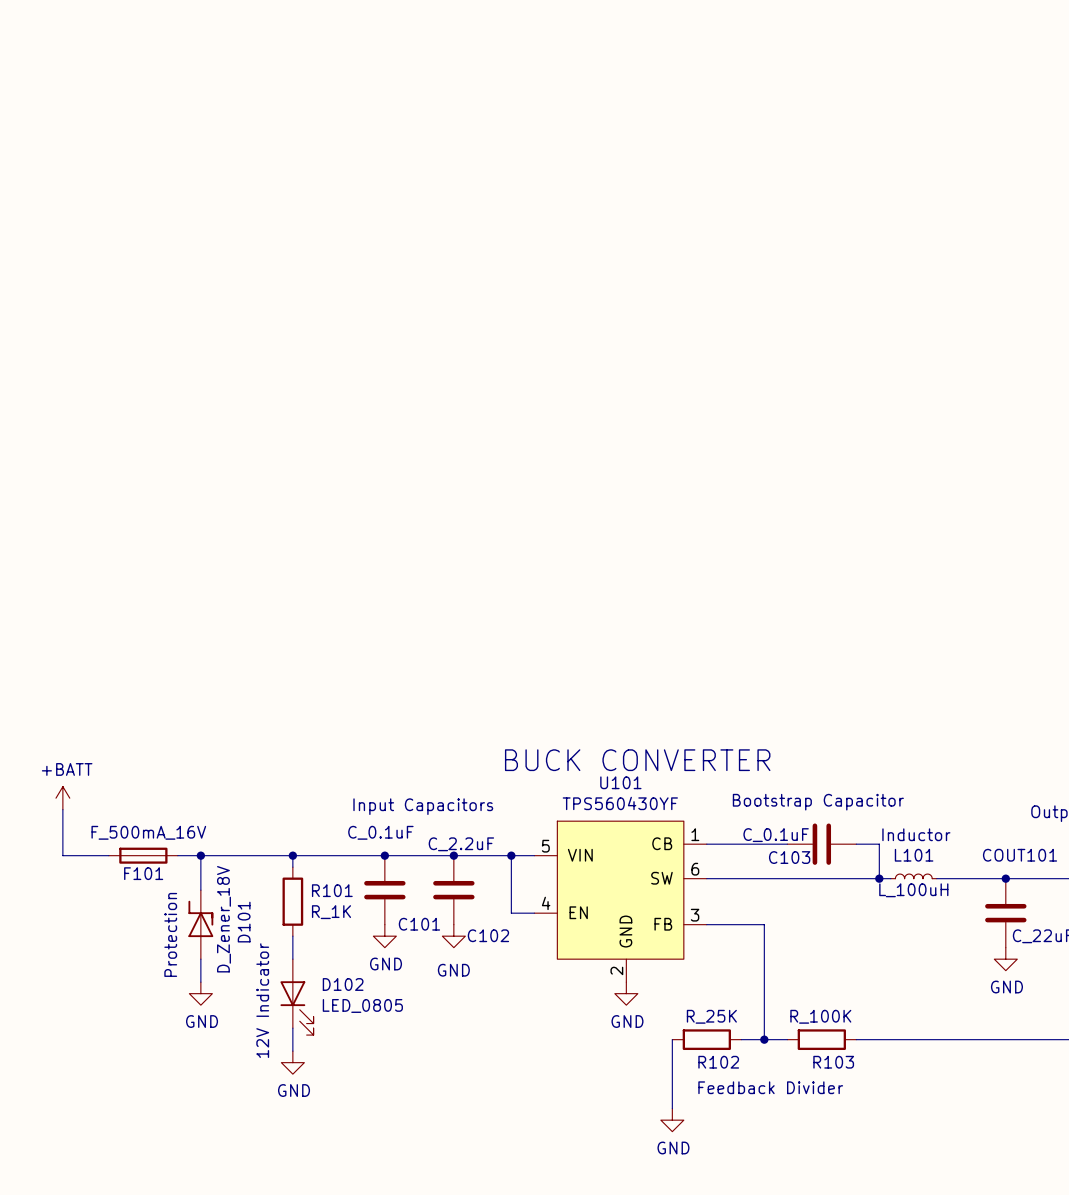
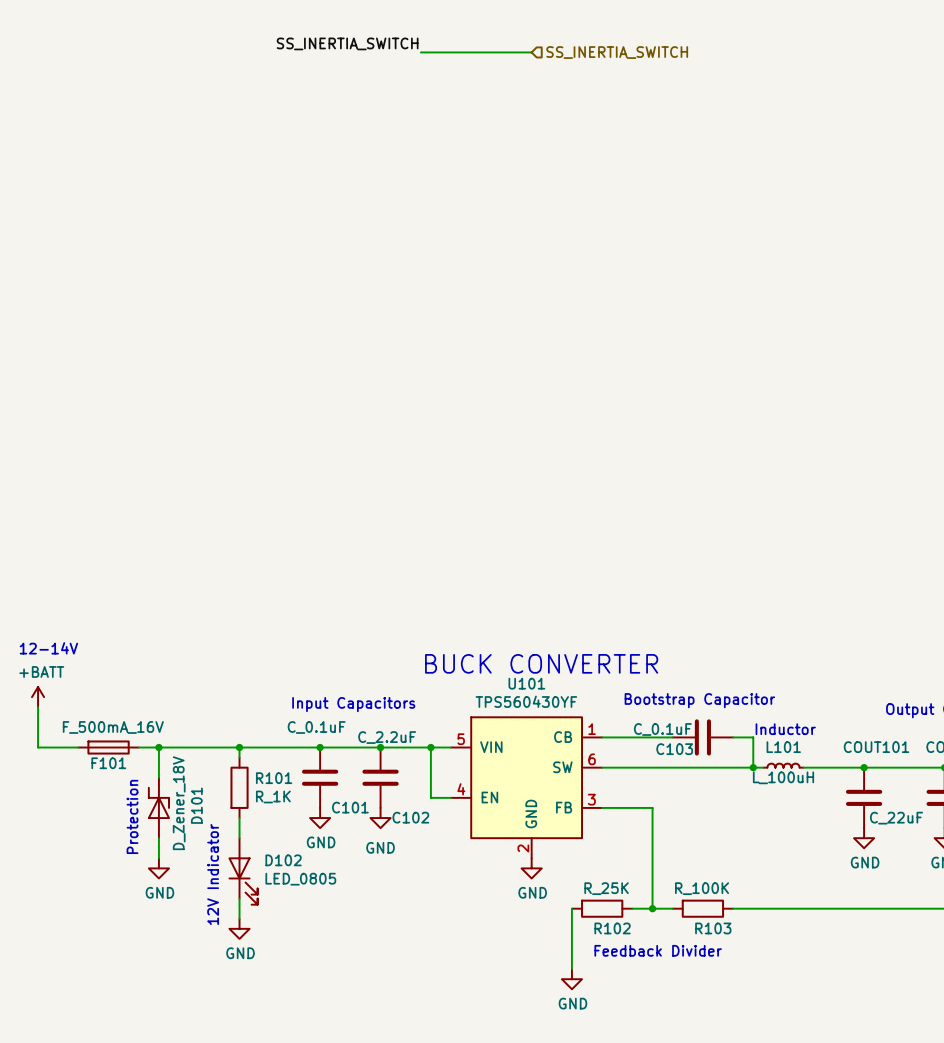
label: none -> SS_INERTIA_SWITCH (347, 43)
wire: none -> (420, 52) (531, 52)
hierarchical label: none -> SS_INERTIA_SWITCH (617, 52)
text: none -> 12-14V (48, 648)

